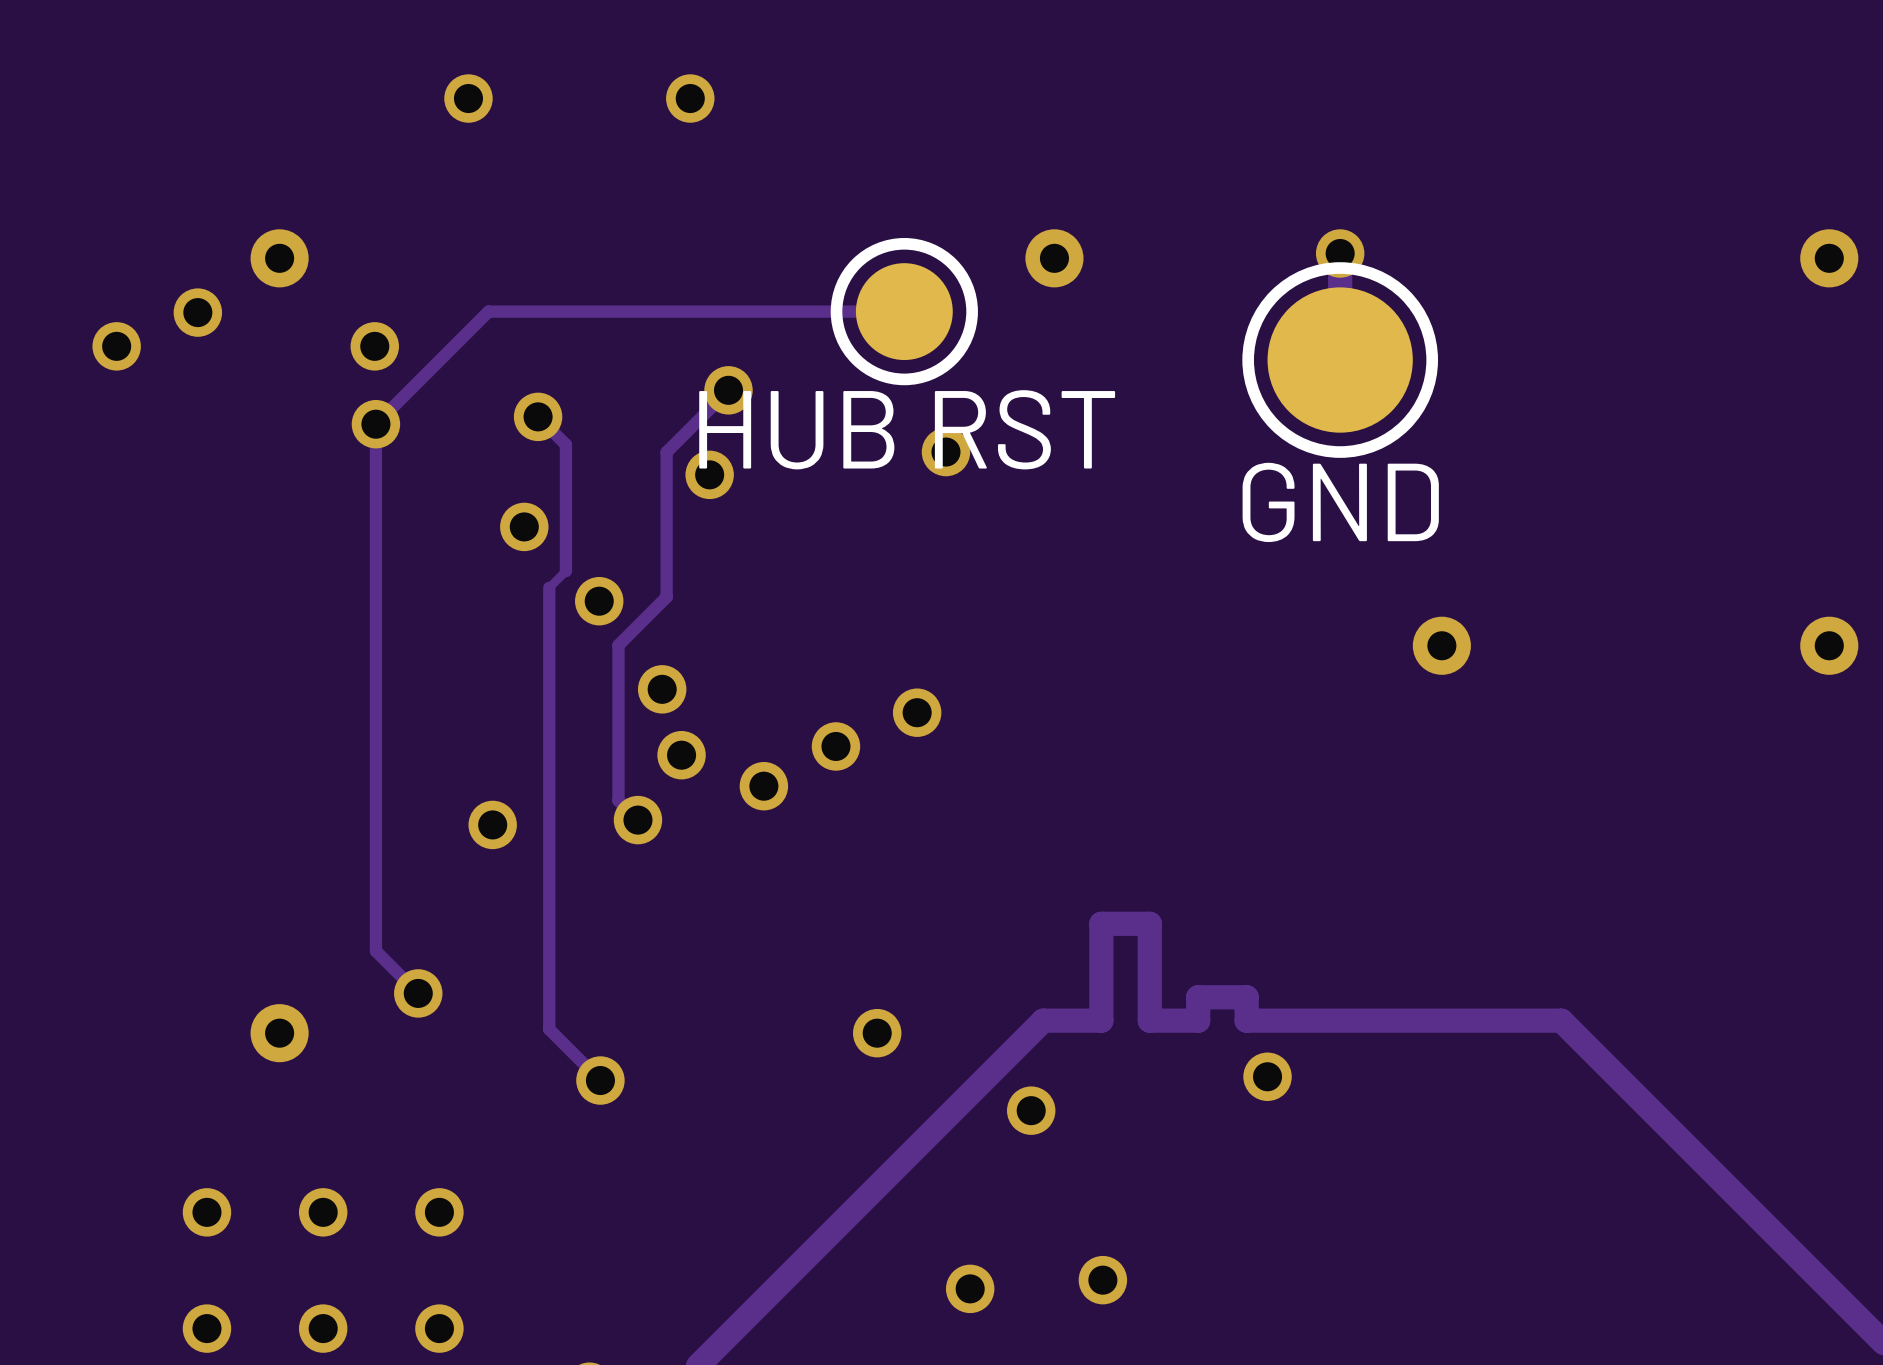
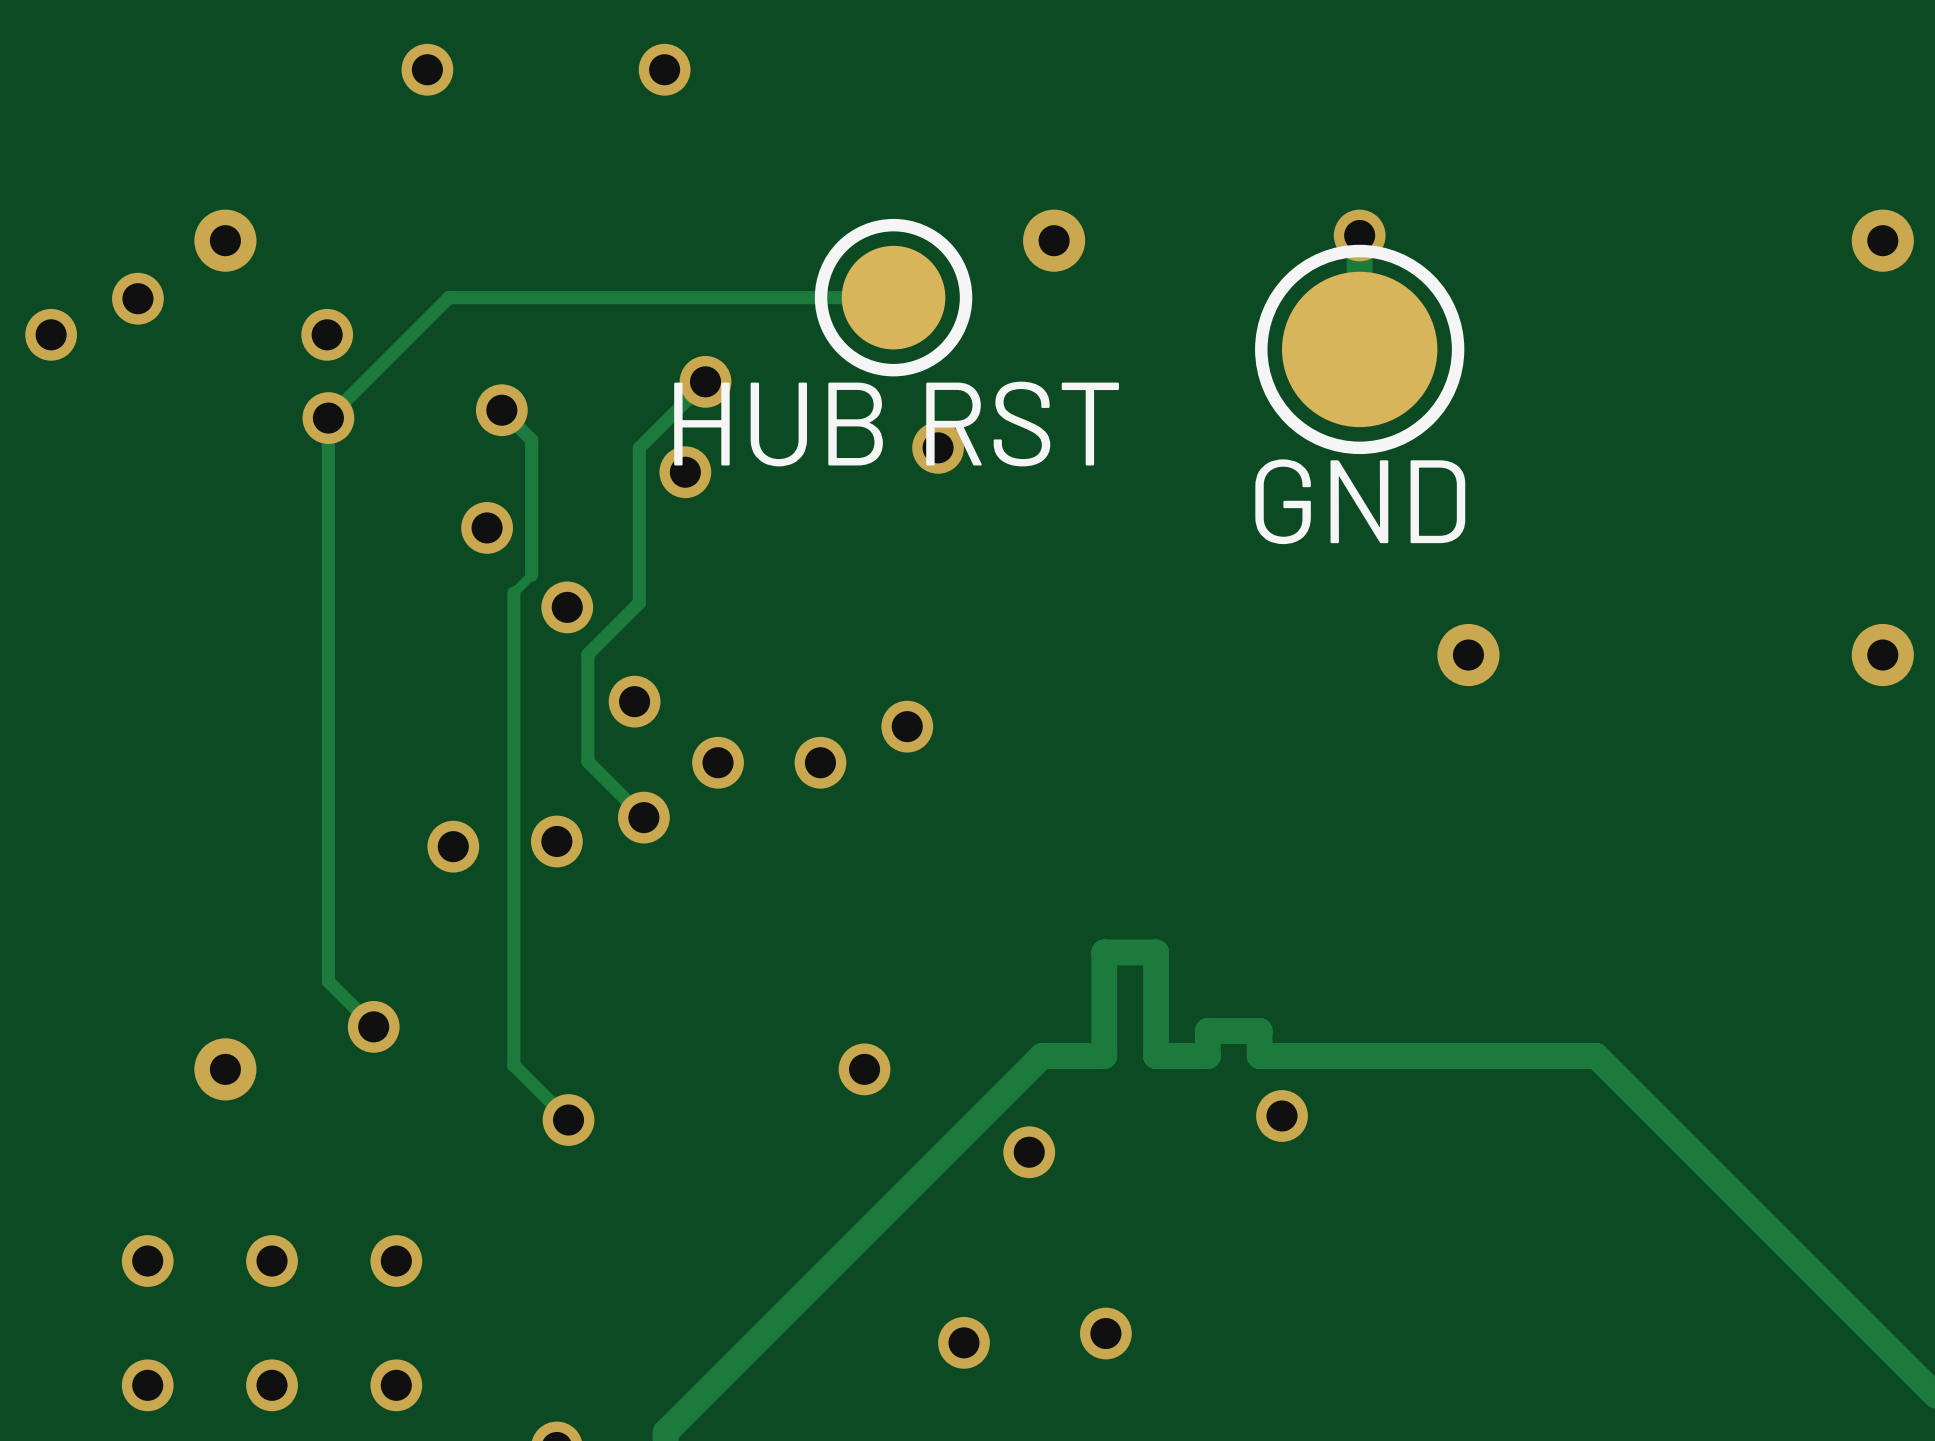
track: (618, 745) (618, 800) (637, 820) -> (587, 761) (643, 817)
via: (681, 755) -> none
via position: (763, 786) -> (718, 762)
via: none -> (643, 817)
via: none -> (556, 841)
via: (637, 820) -> none

